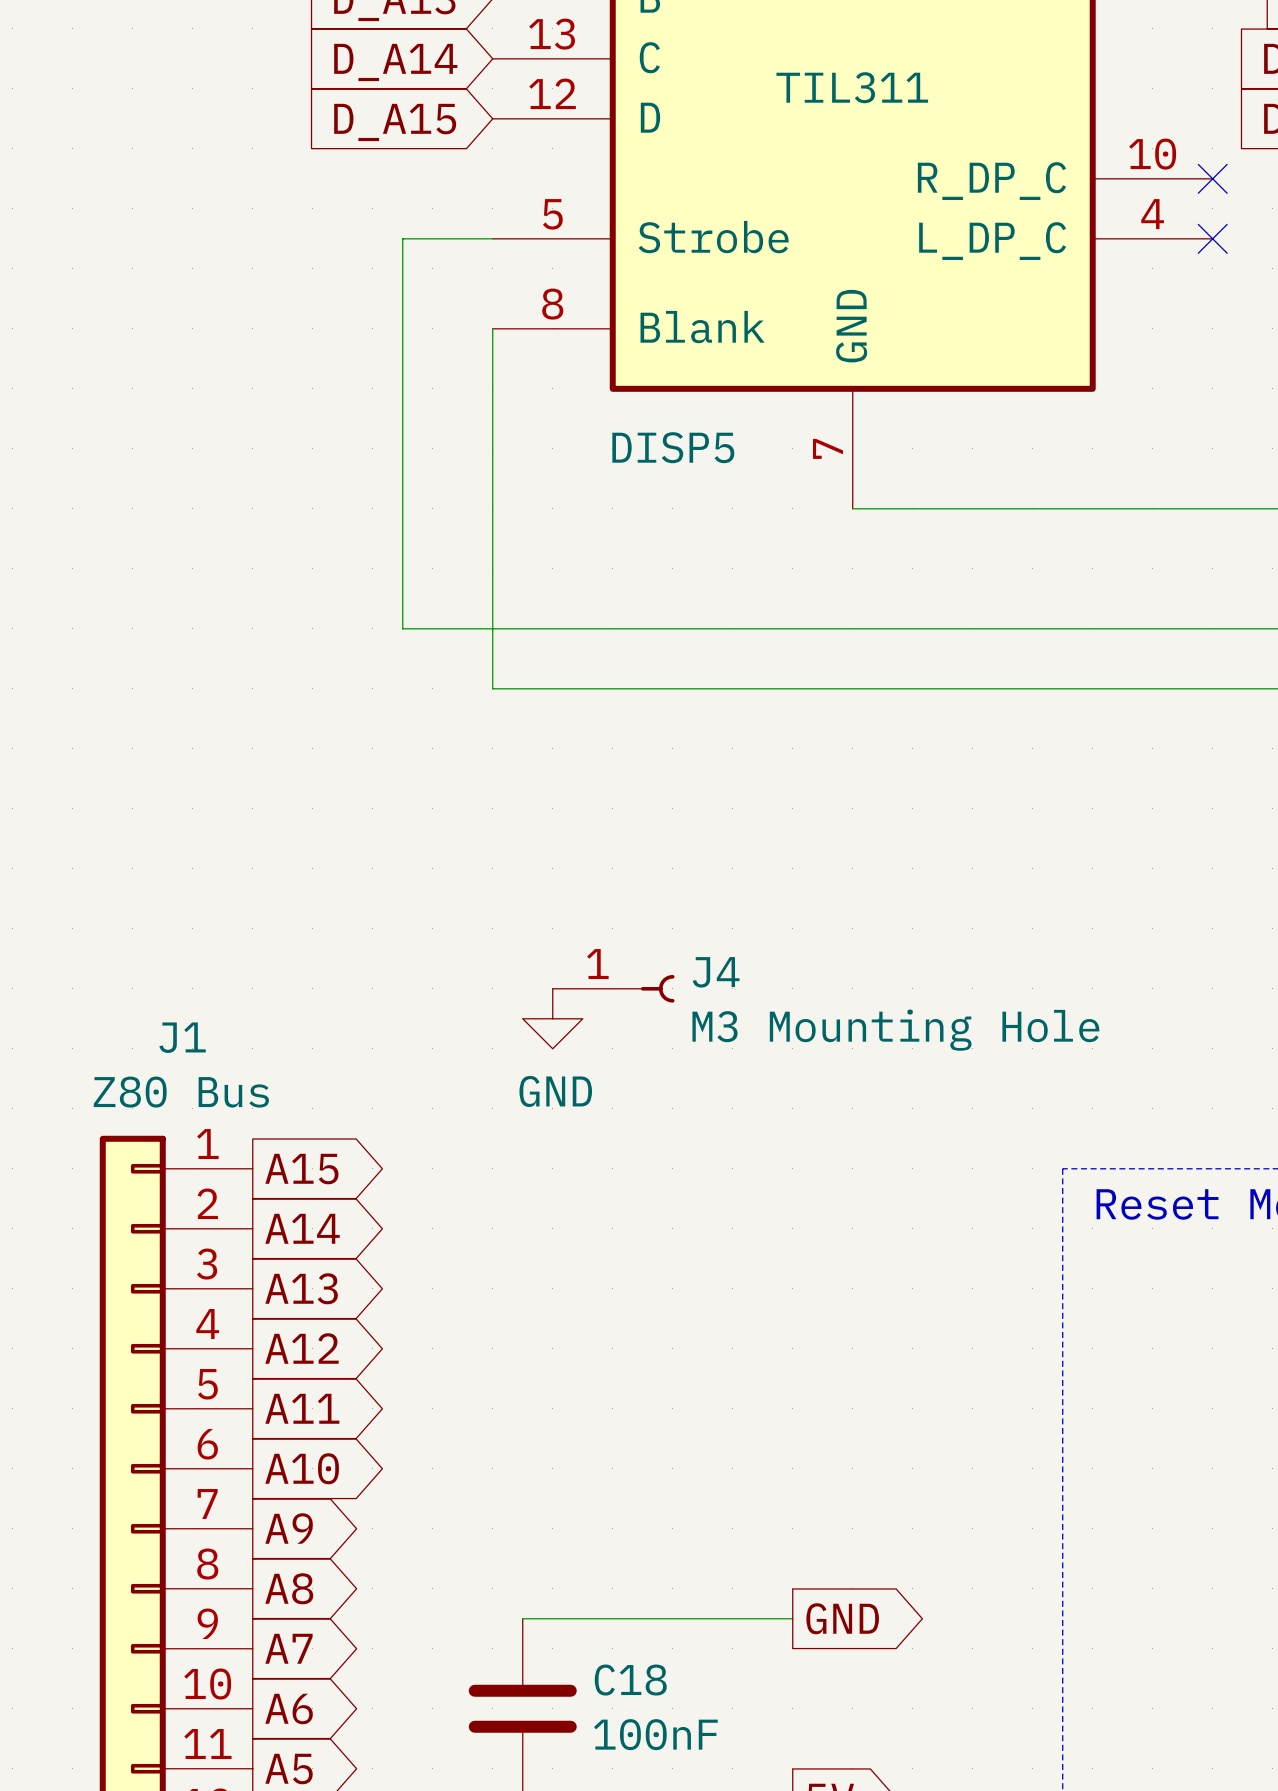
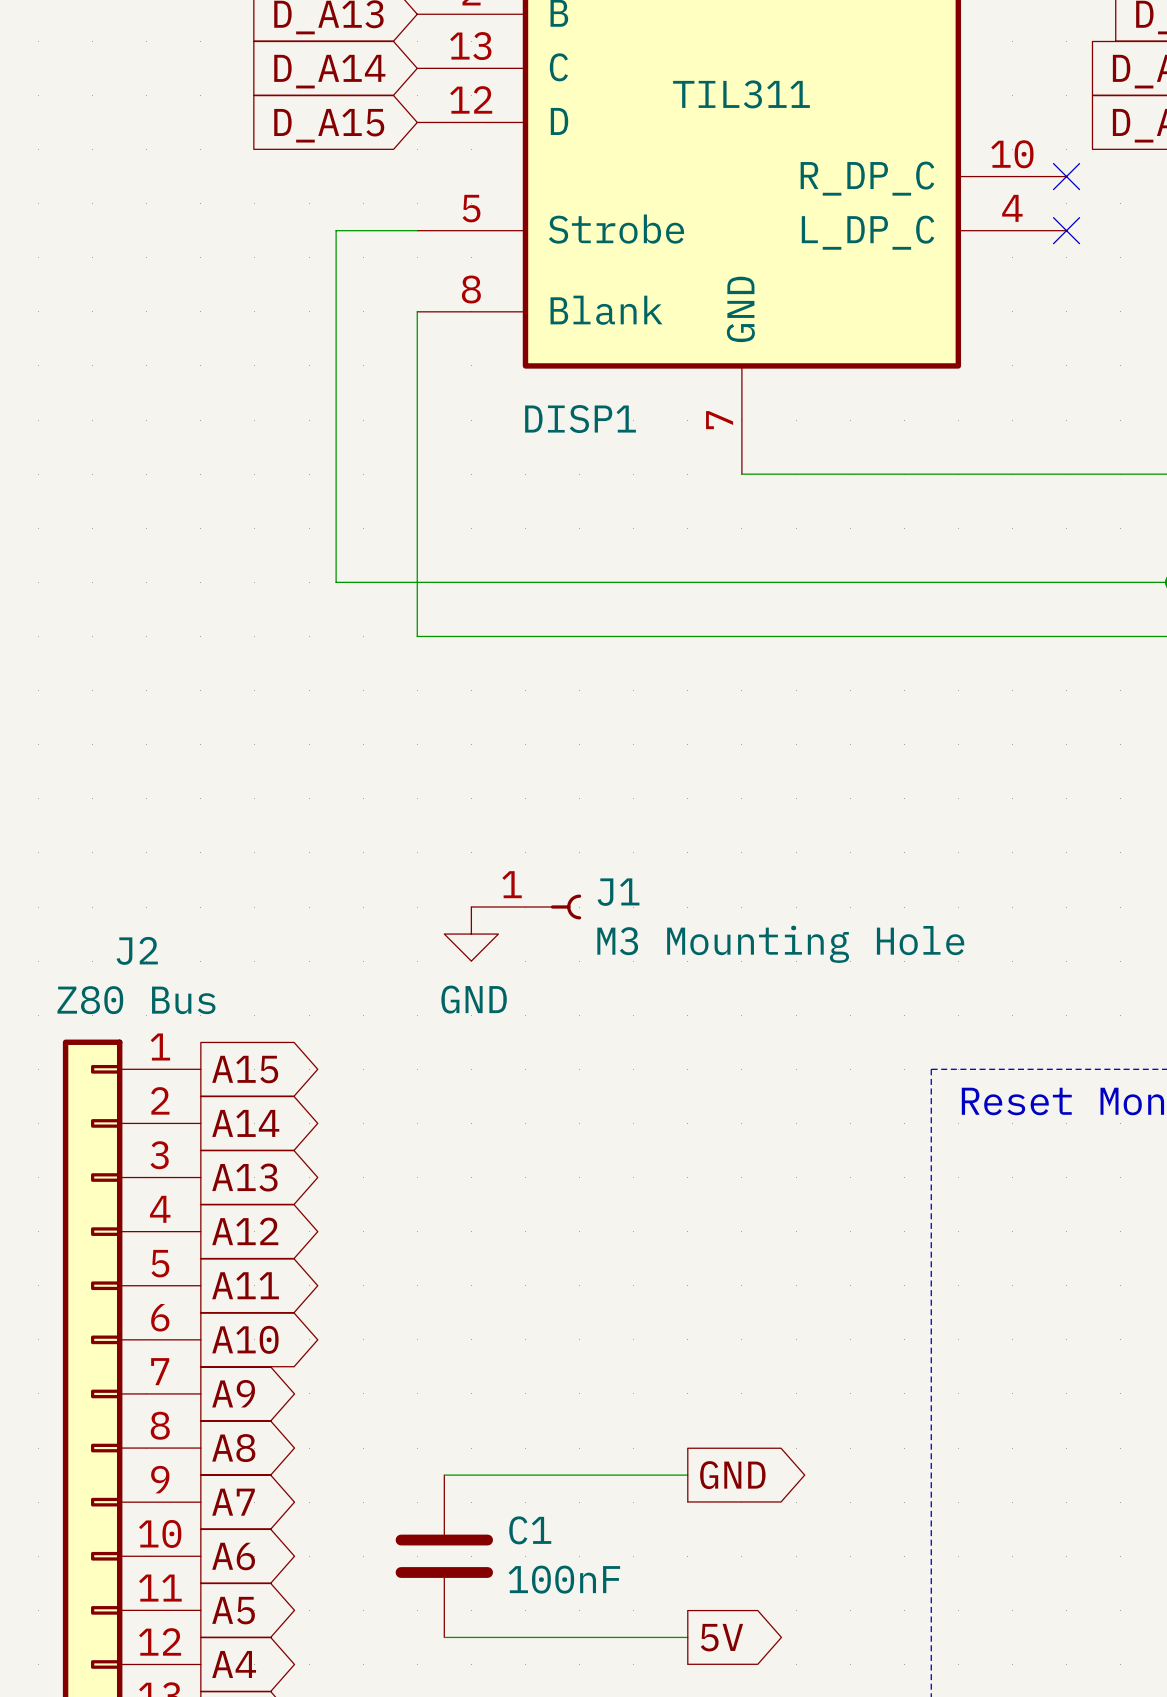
DISP5 name: DISP5 (673, 447) -> DISP1 (580, 419)
J4 name: J4 (716, 972) -> J1 (618, 892)
J1 name: J1 (182, 1037) -> J2 (137, 950)
C18 name: C18 (630, 1680) -> C1 (530, 1530)

